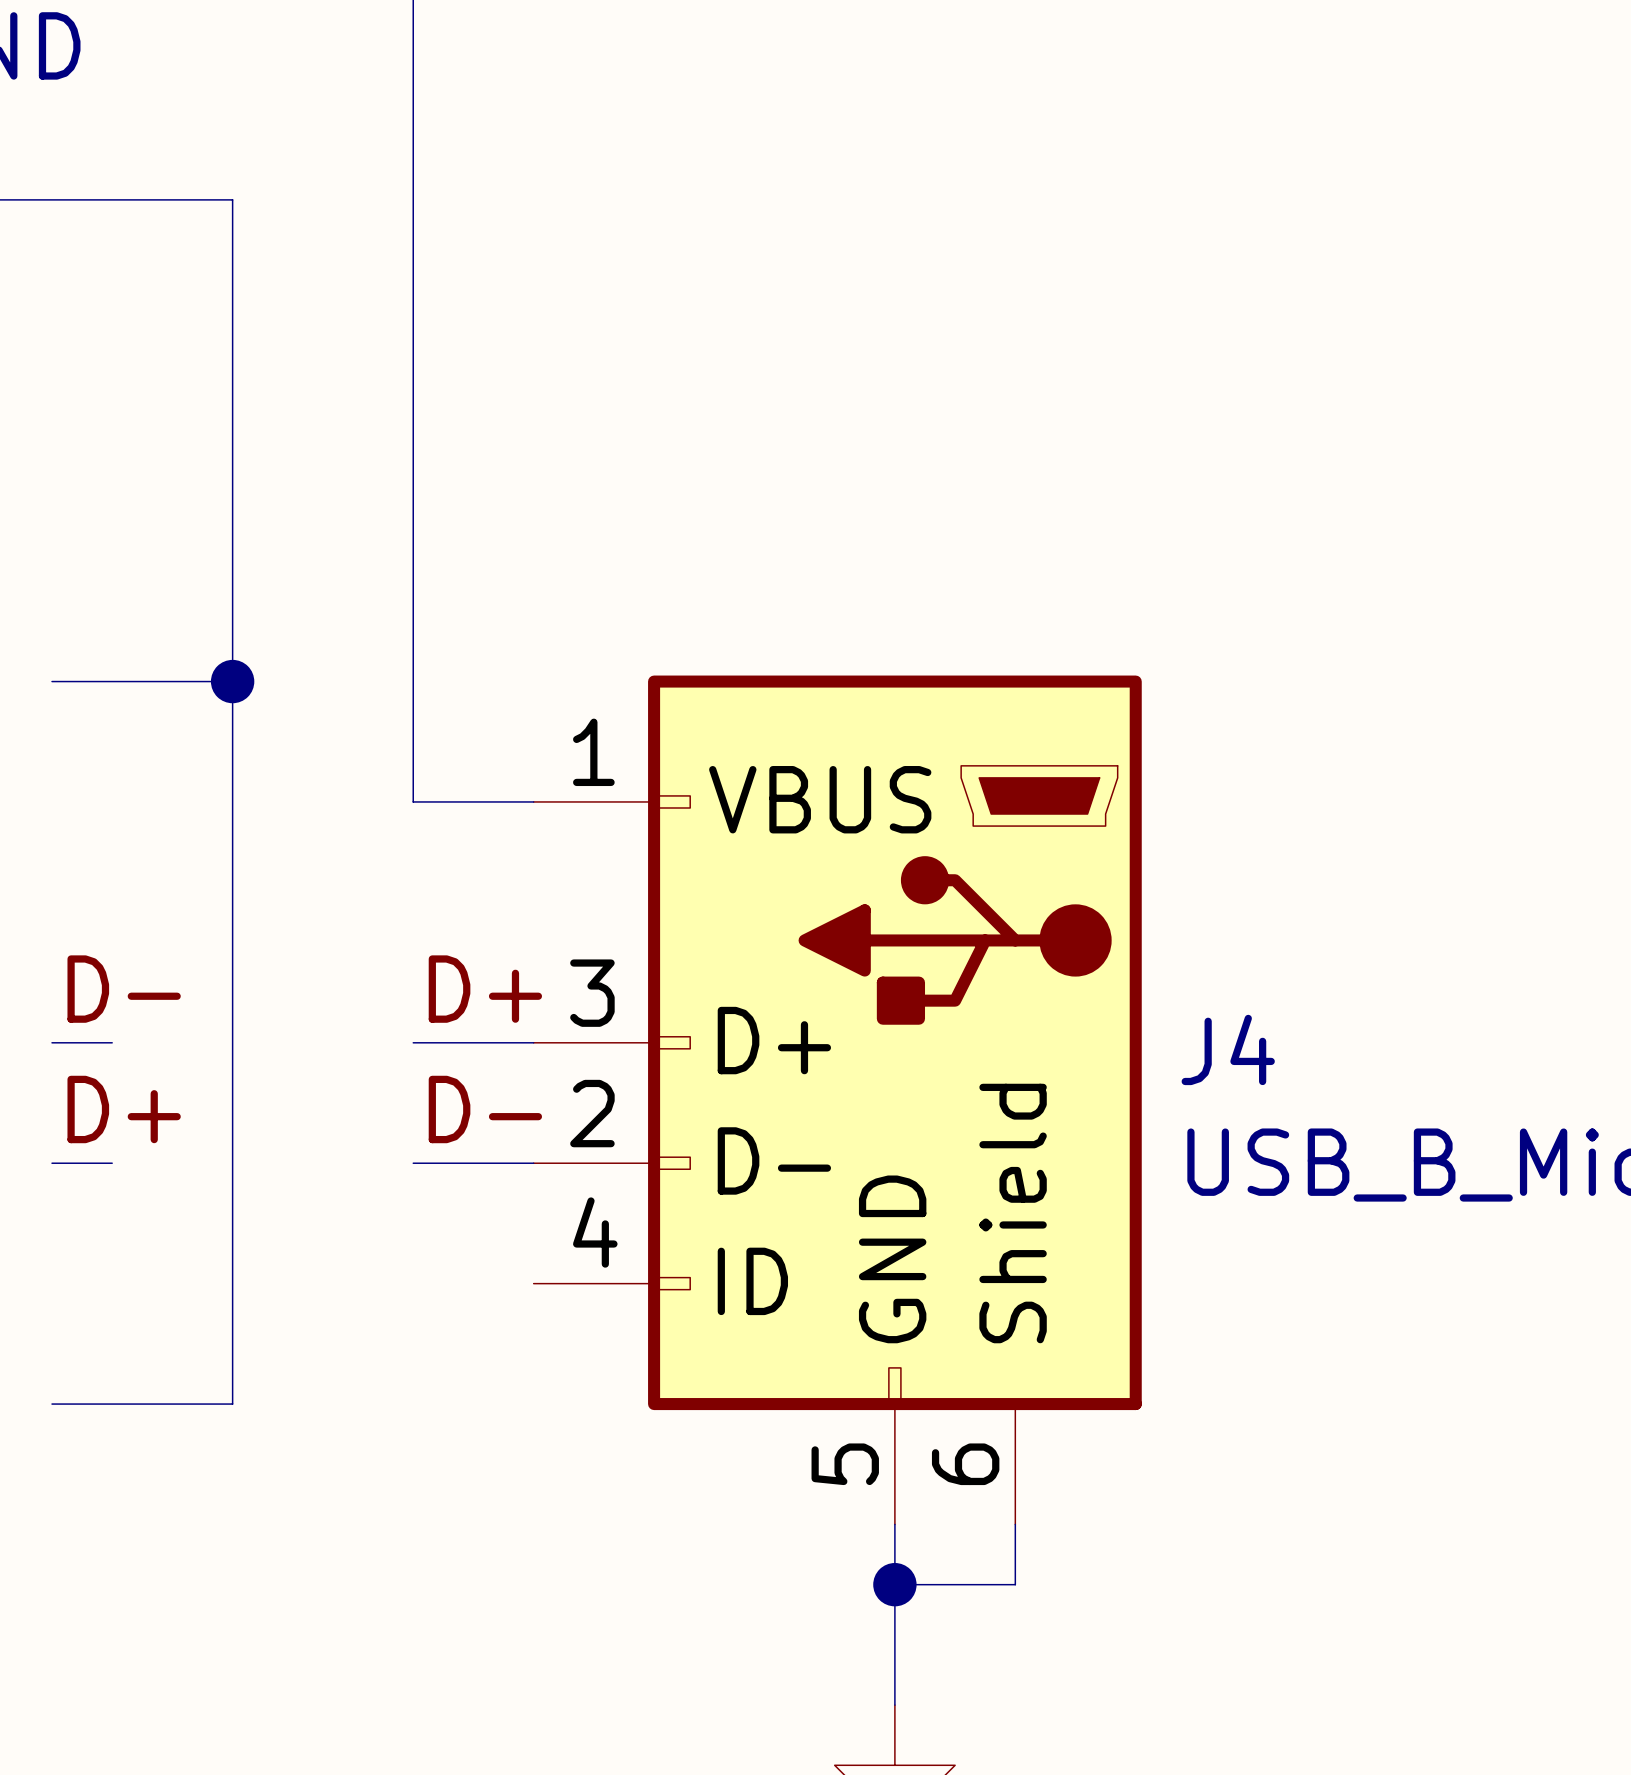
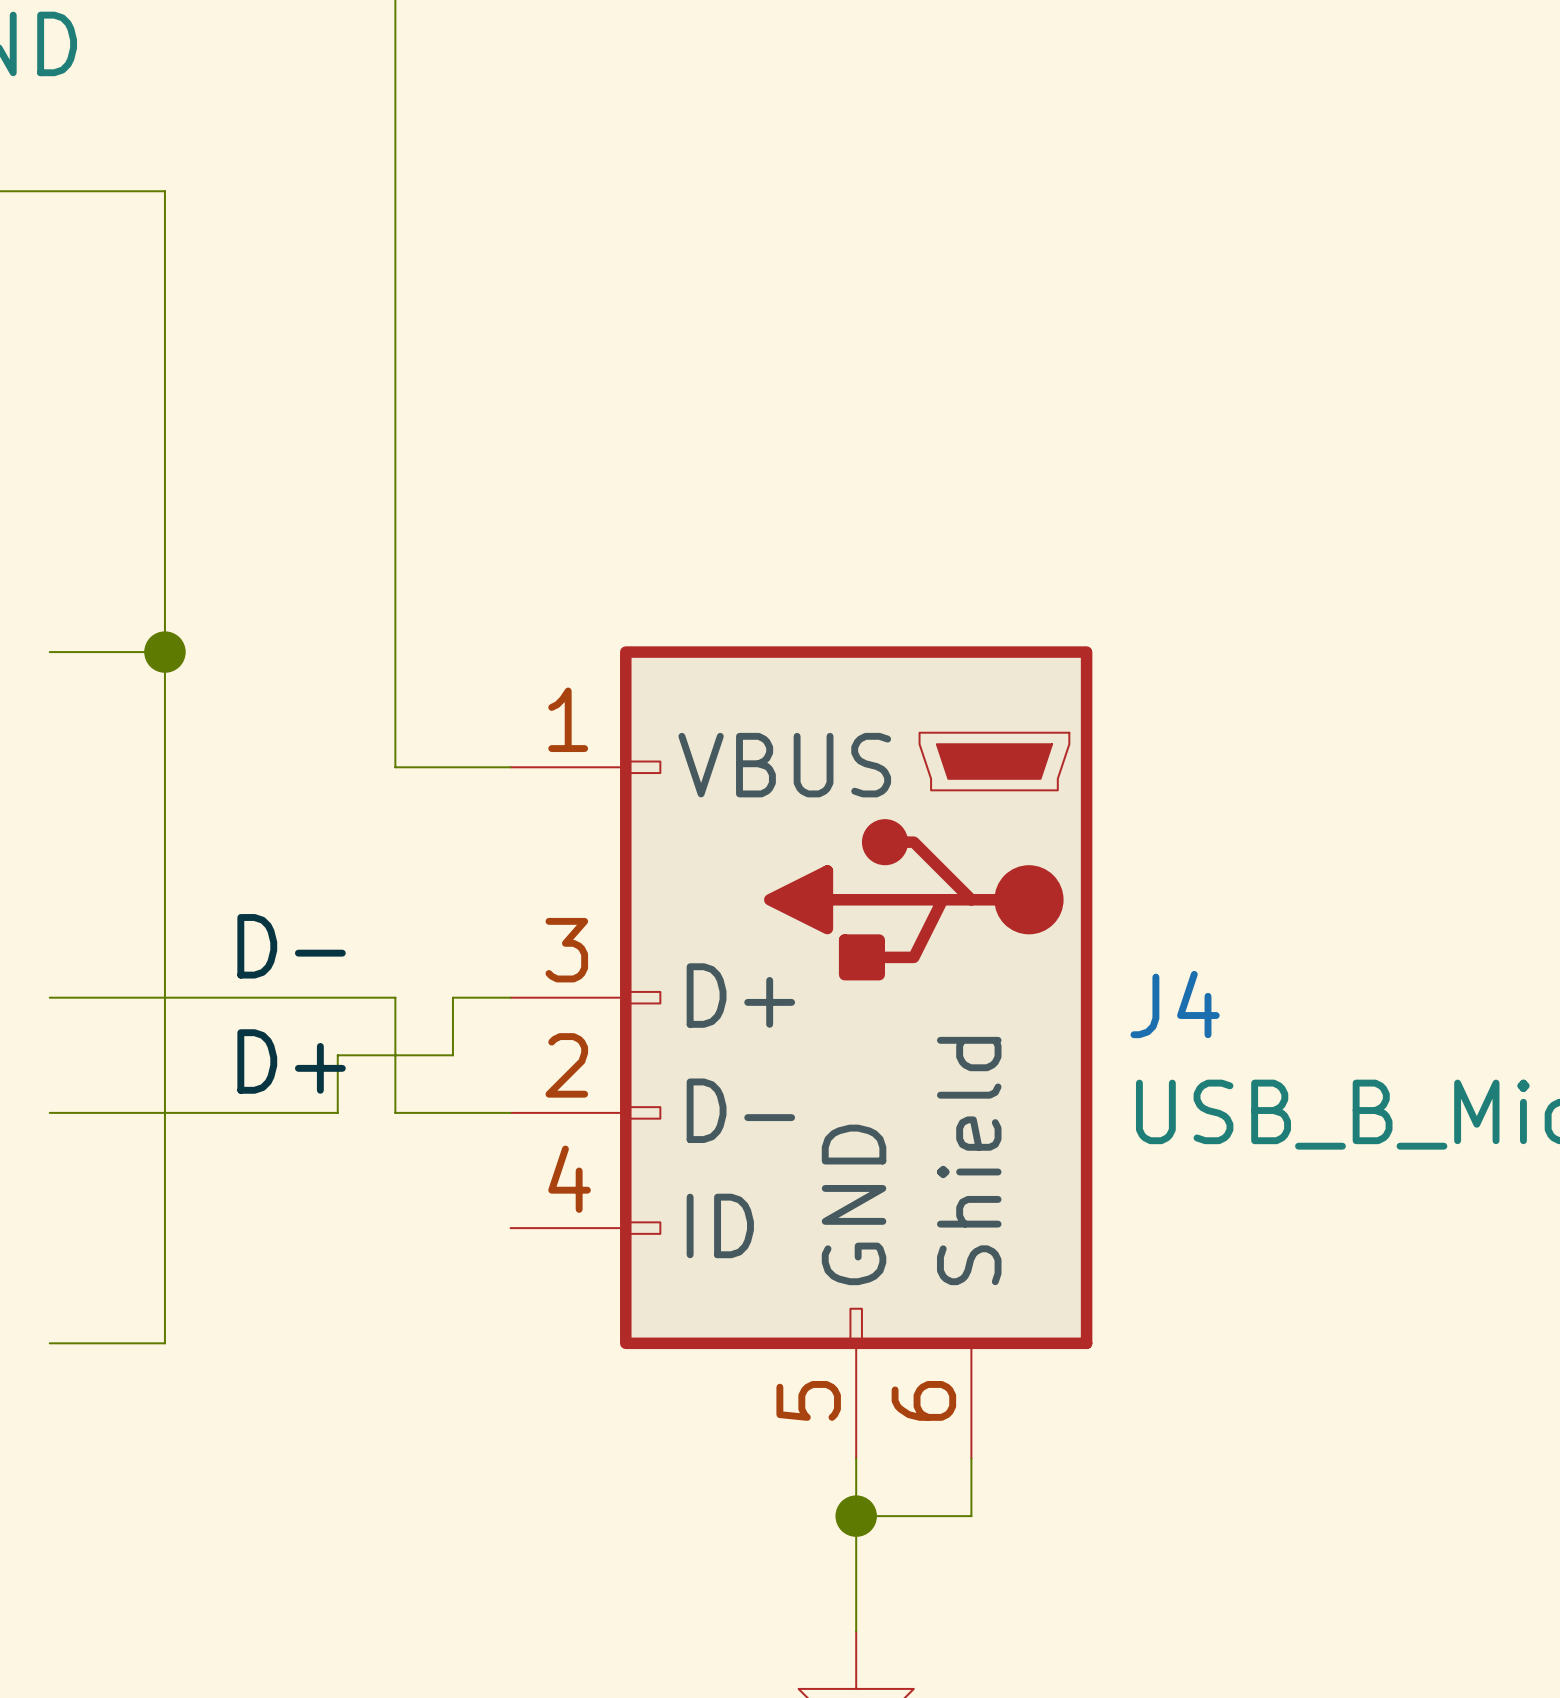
wire: (172, 199) (232, 199) (232, 1404) (172, 1404) -> (164, 191) (164, 1343)
wire: (172, 681) (232, 681) -> none
junction position: (232, 681) -> (164, 652)
label: D- (124, 989) -> none
label: none -> D- (291, 946)
label: D+ (485, 989) -> none
wire: none -> (107, 997) (395, 997) (395, 1112)
wire: (413, 1042) (473, 1042) -> (107, 1112) (337, 1112) (337, 1055) (452, 1055) (452, 997)
label: D+ (124, 1109) -> none
label: none -> D+ (291, 1061)
label: D- (485, 1109) -> none

